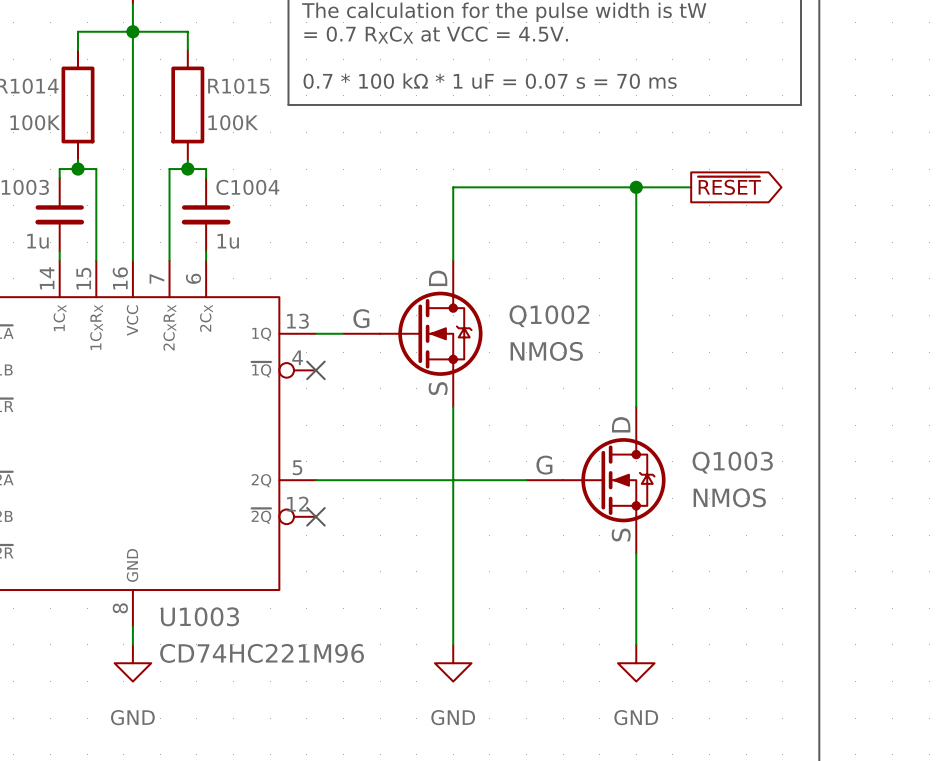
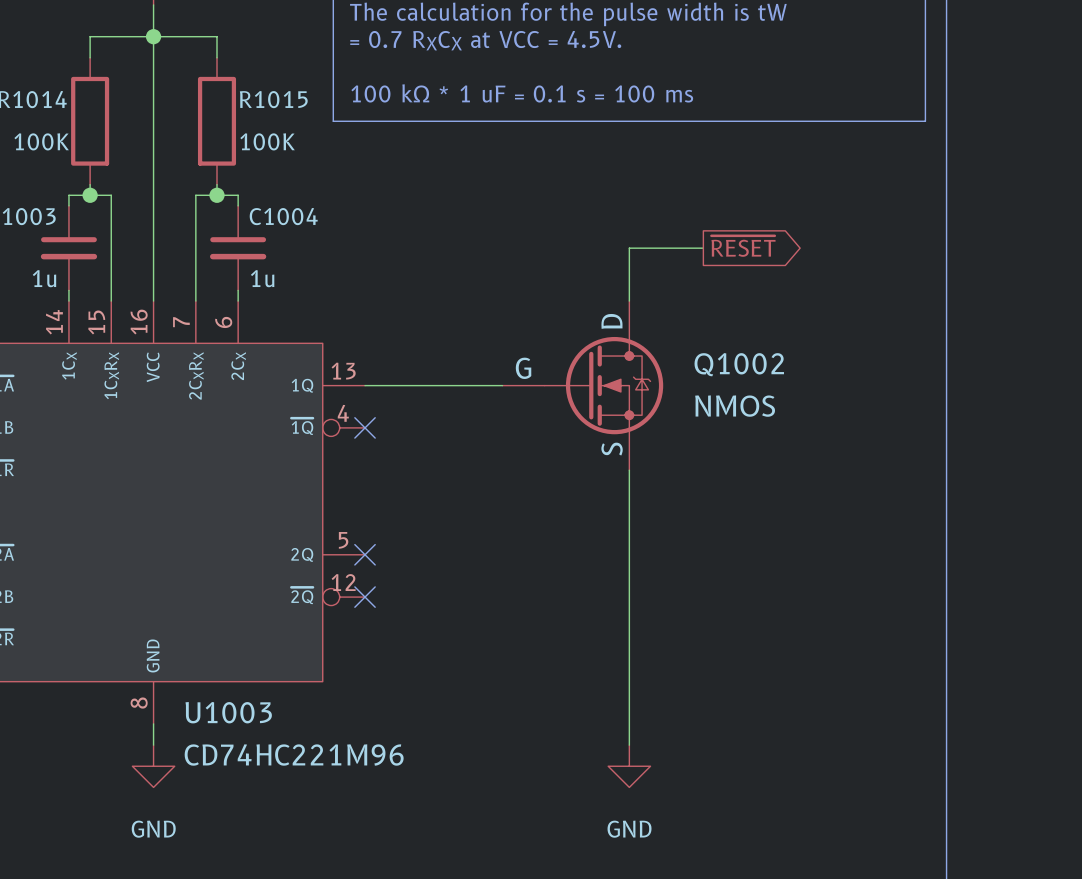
text: 0.7 * 100 kΩ * 1 uF = 0.07 s = 70 ms (490, 81) -> 100 kΩ * 1 uF = 0.1 s = 100 ms (522, 93)
global label position: ~{RESET} (729, 185) -> ~{RESET} (743, 246)
wire: (636, 187) (636, 406) -> none
junction: (636, 187) -> none
wire: (691, 187) (453, 187) (453, 260) -> none
wire: none -> (703, 248) (629, 248) (629, 301)
Q1002 position: (412, 333) -> (582, 385)
wire: (453, 406) (453, 644) -> (629, 470) (629, 745)
wire: (315, 480) (526, 480) -> none
no-connect mark: none -> (365, 554)
Q1003: NMOS (596, 480) -> none
wire: (636, 553) (636, 644) -> none
power symbol: GND (453, 663) -> none
power symbol: none -> GND (629, 766)
power symbol: GND (636, 663) -> none

